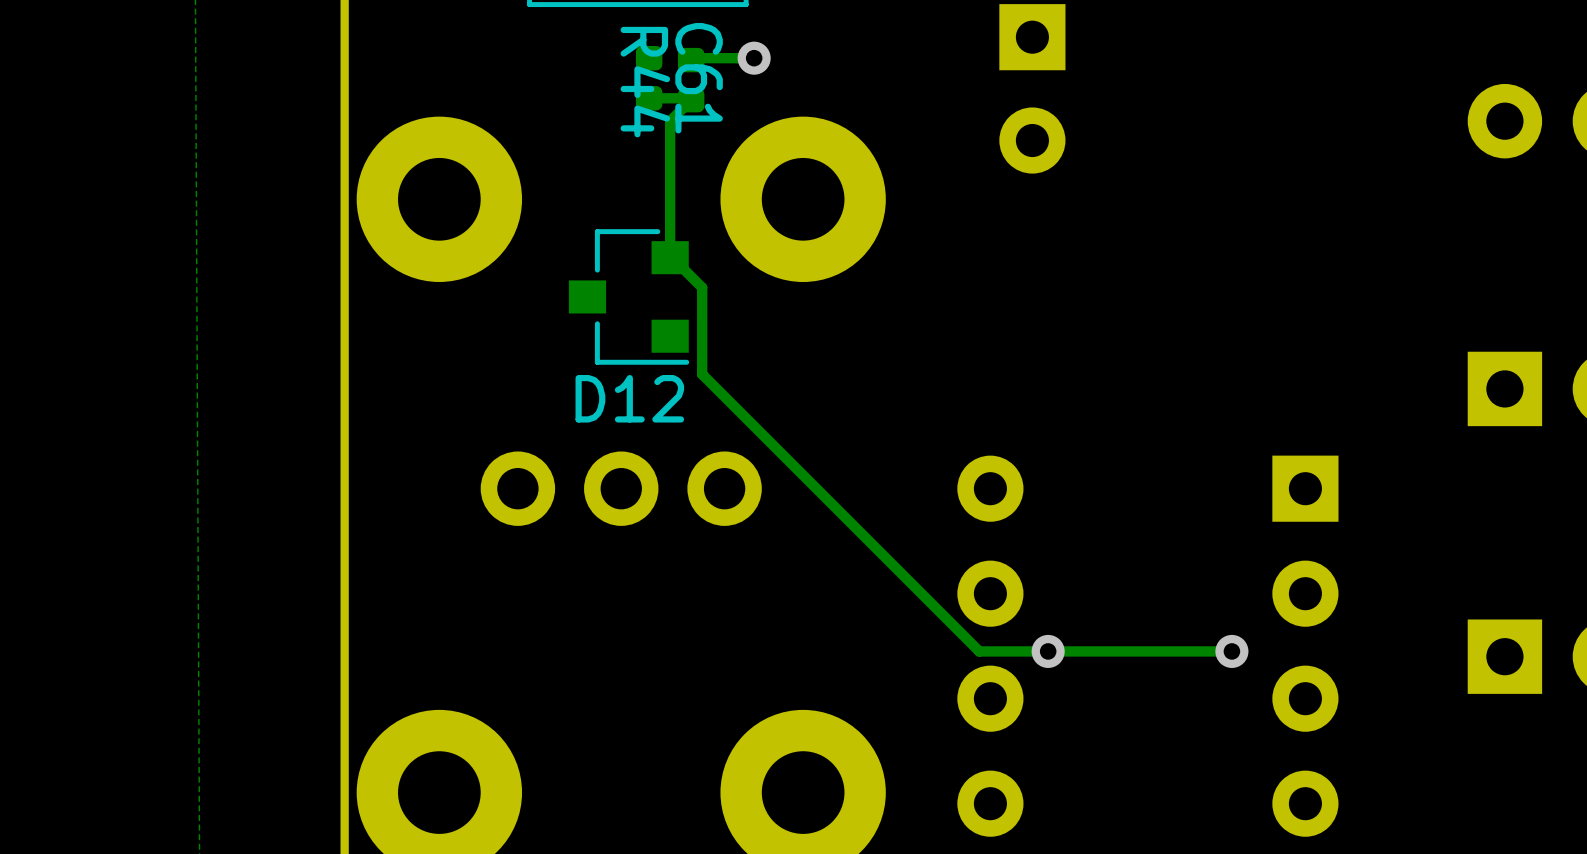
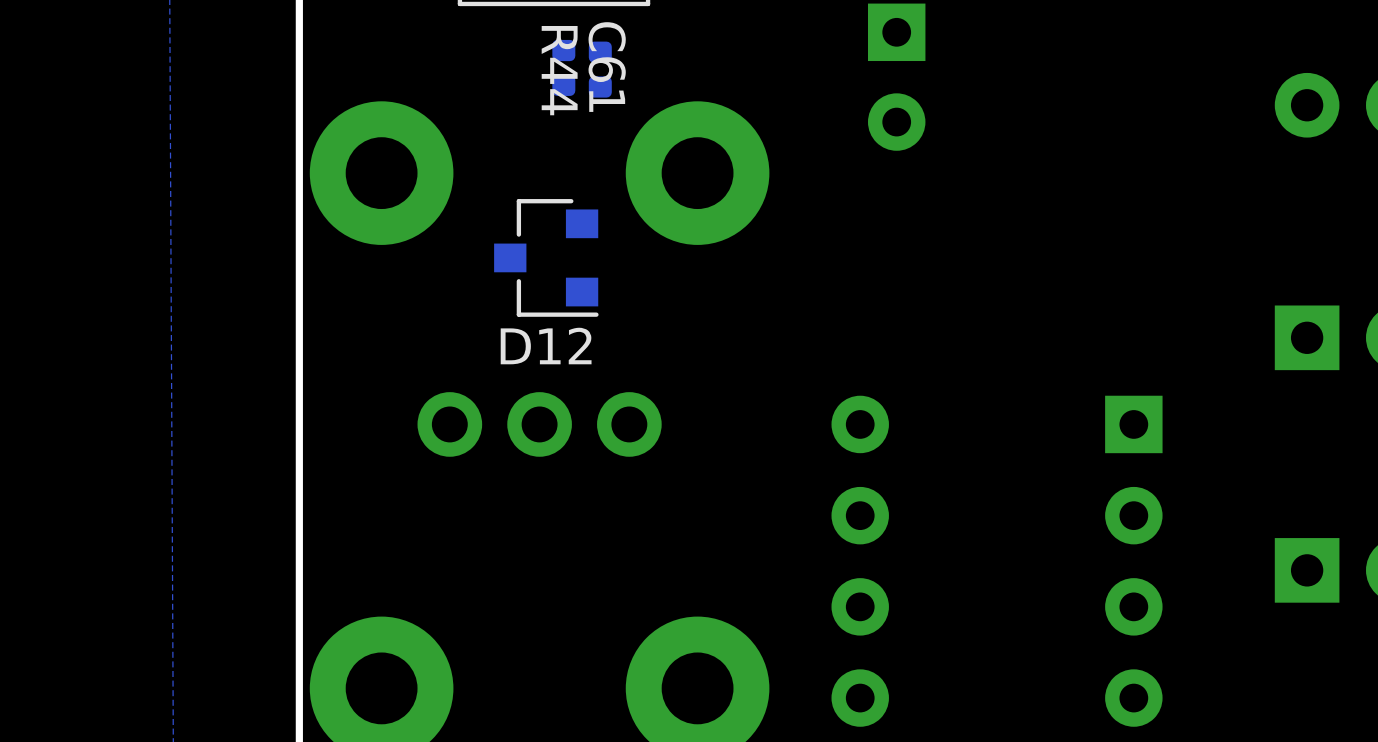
track: (754, 58) (693, 58) (691, 60) -> none
via: (754, 58) -> none
track: (649, 98) (689, 98) (691, 100) (670, 121) (670, 257) (702, 287) (702, 374) (979, 651) (1231, 651) -> none
via: (1048, 651) -> none
via: (1231, 651) -> none

